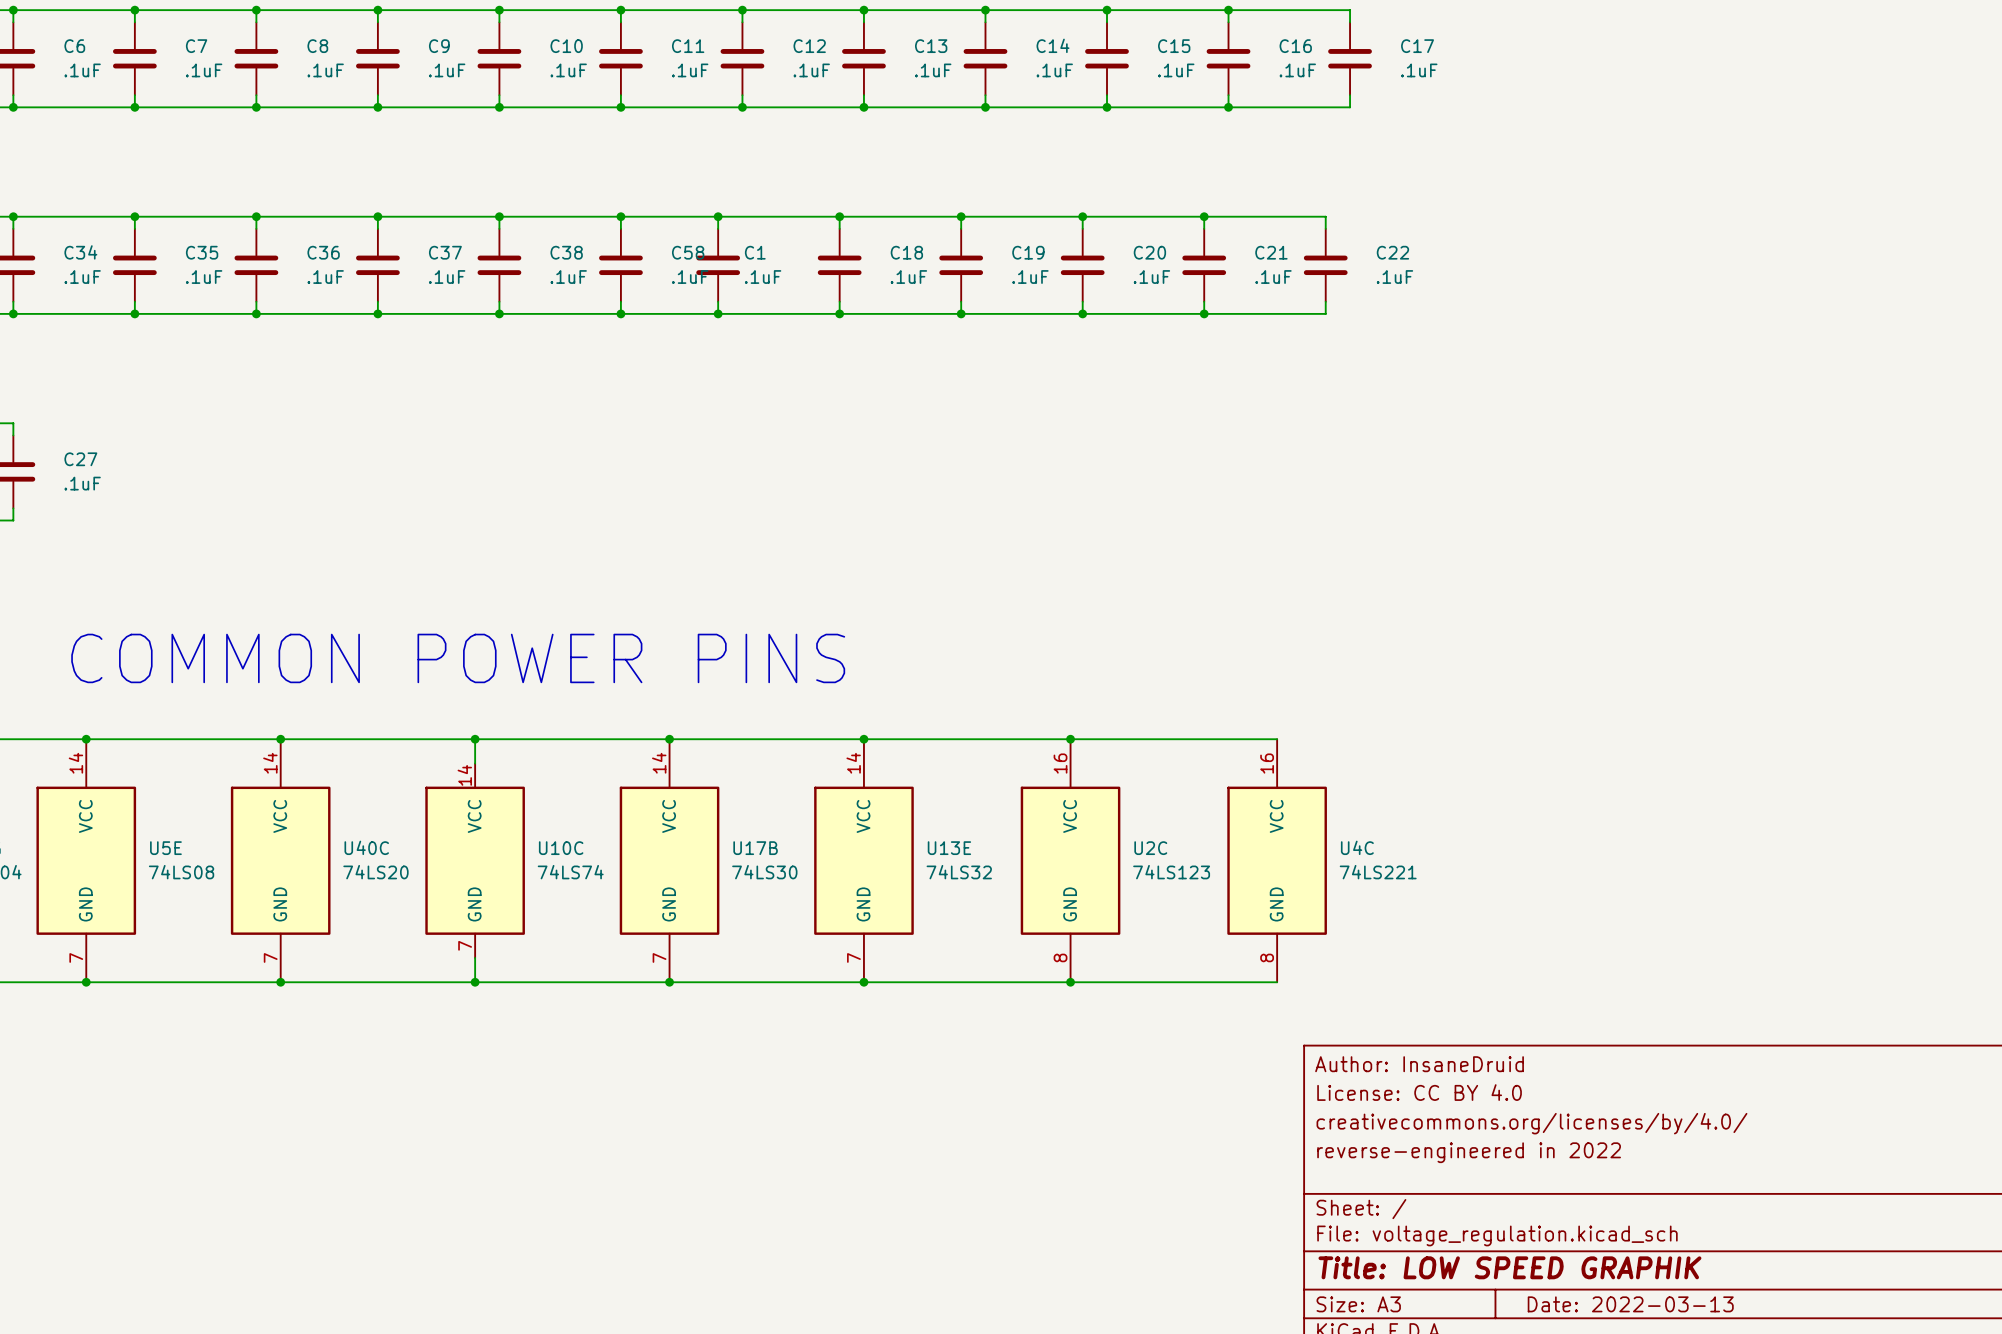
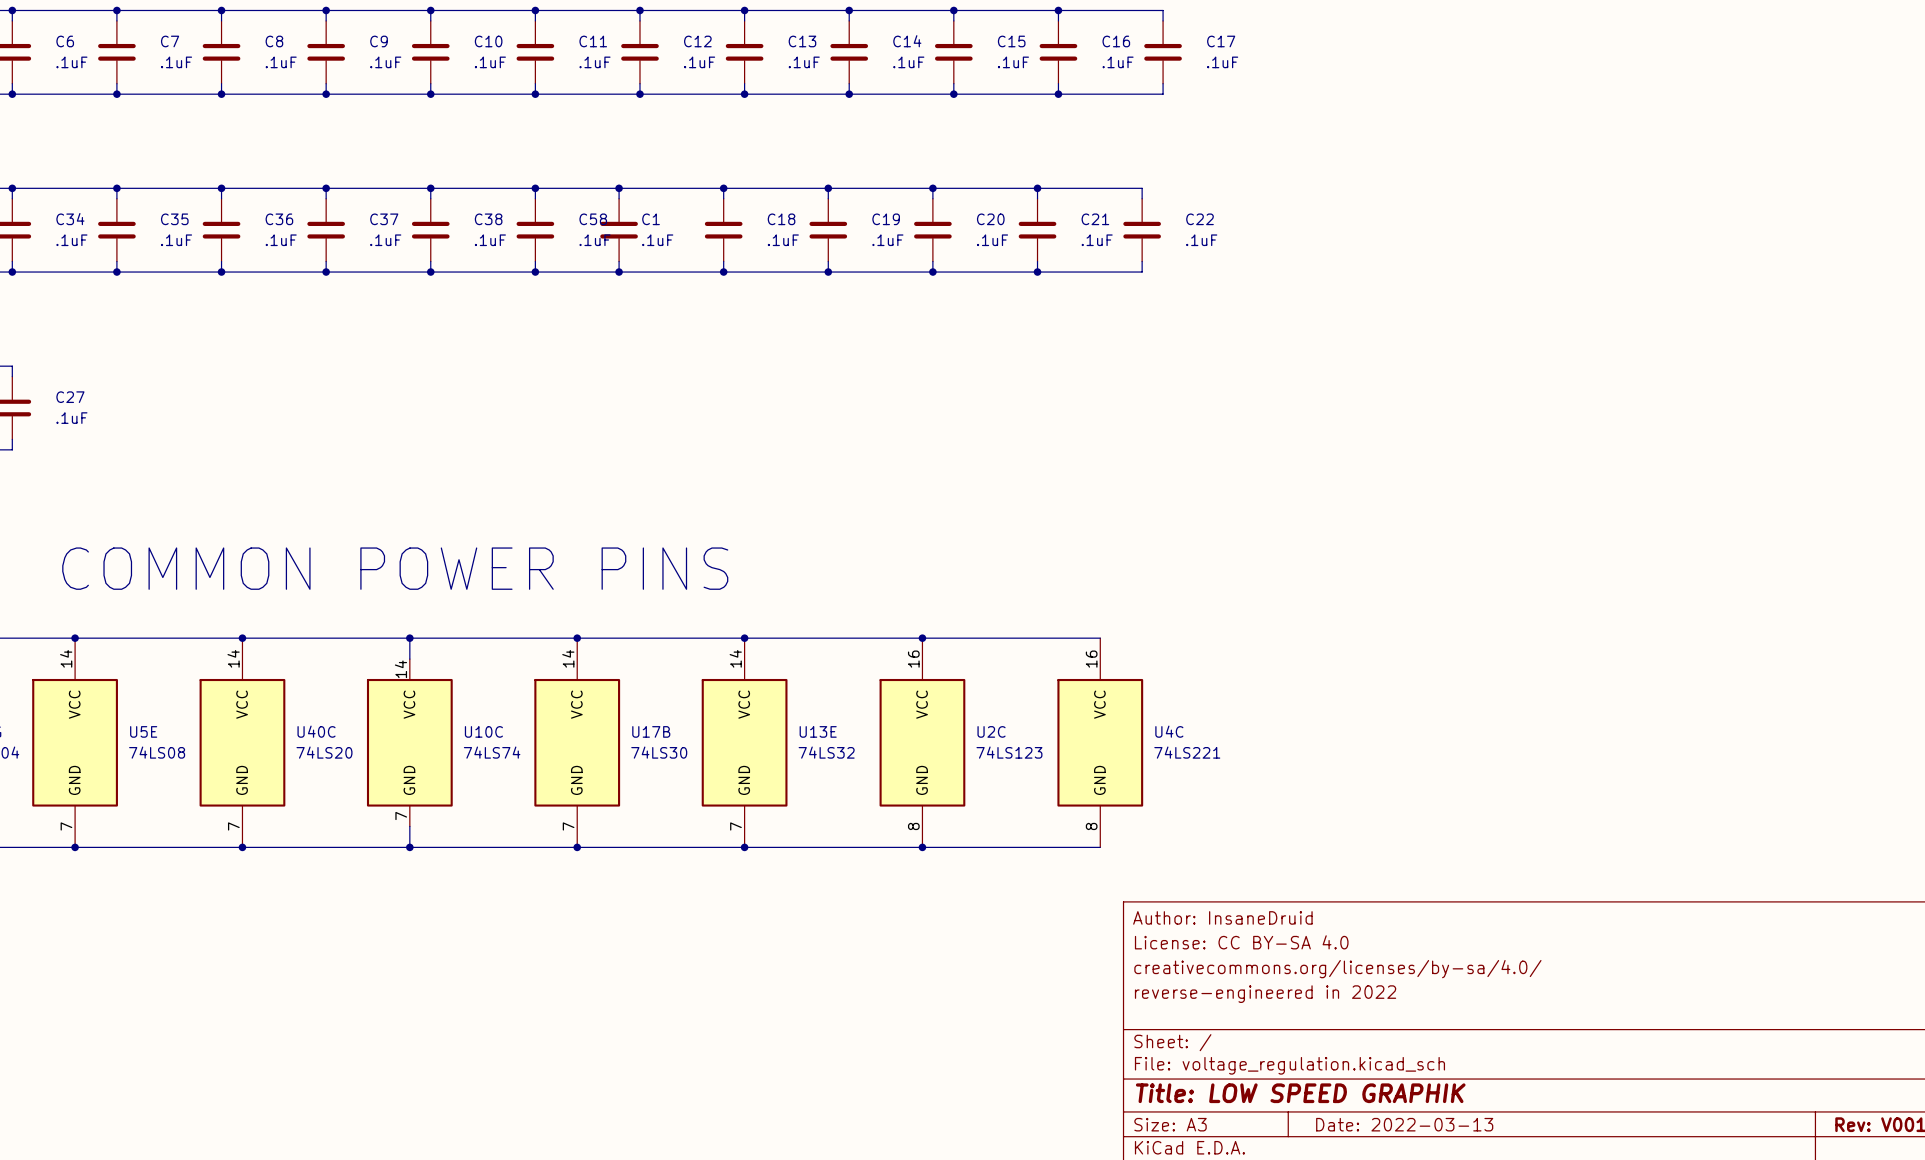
title block: License: CC BY 4.0 (1419, 1092) -> License: CC BY-SA 4.0 (1241, 942)
title block: creativecommons.org/licenses/by/4.0/ (1531, 1123) -> creativecommons.org/licenses/by-sa/4.0/ (1337, 969)

